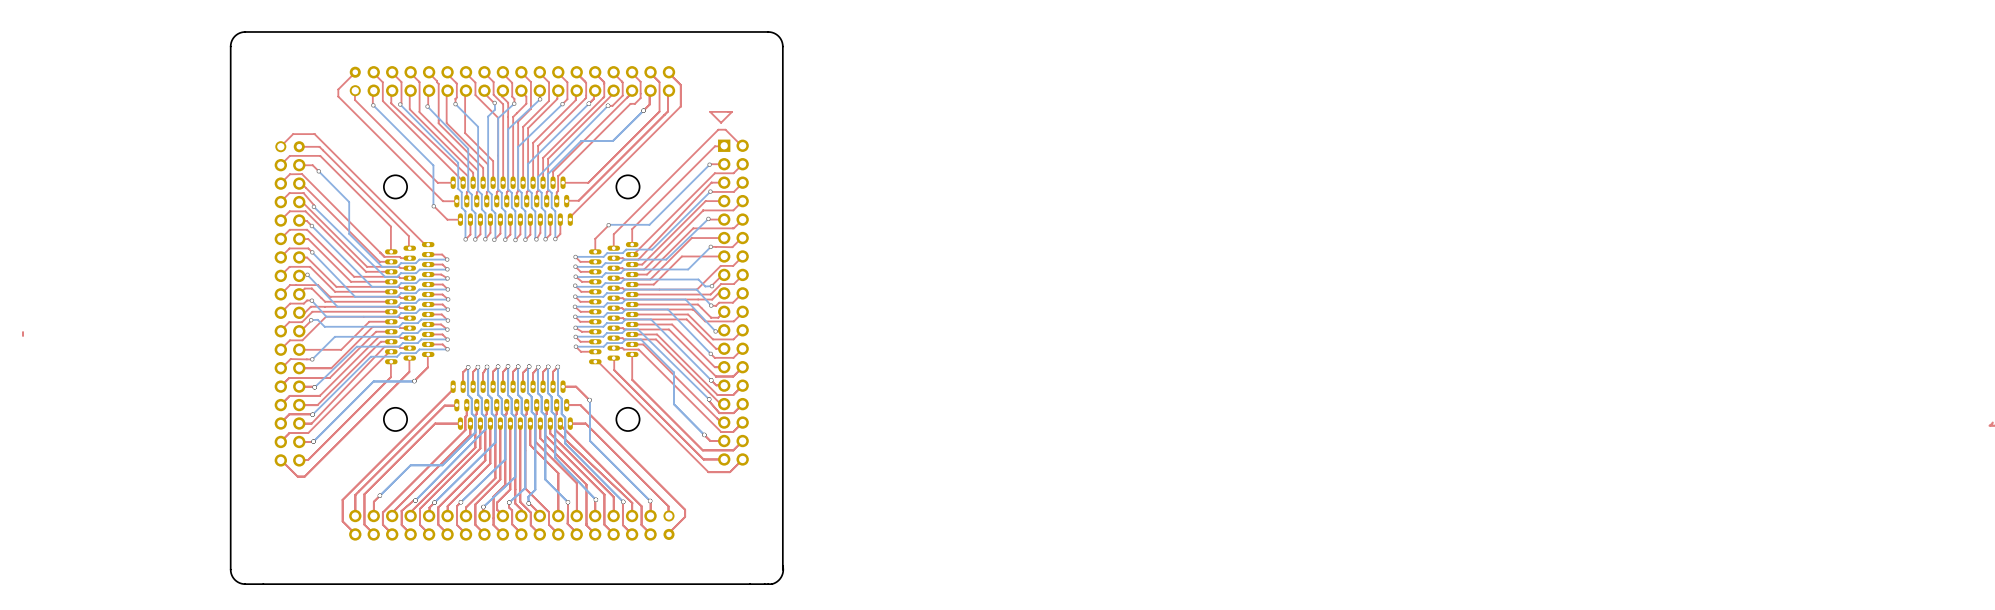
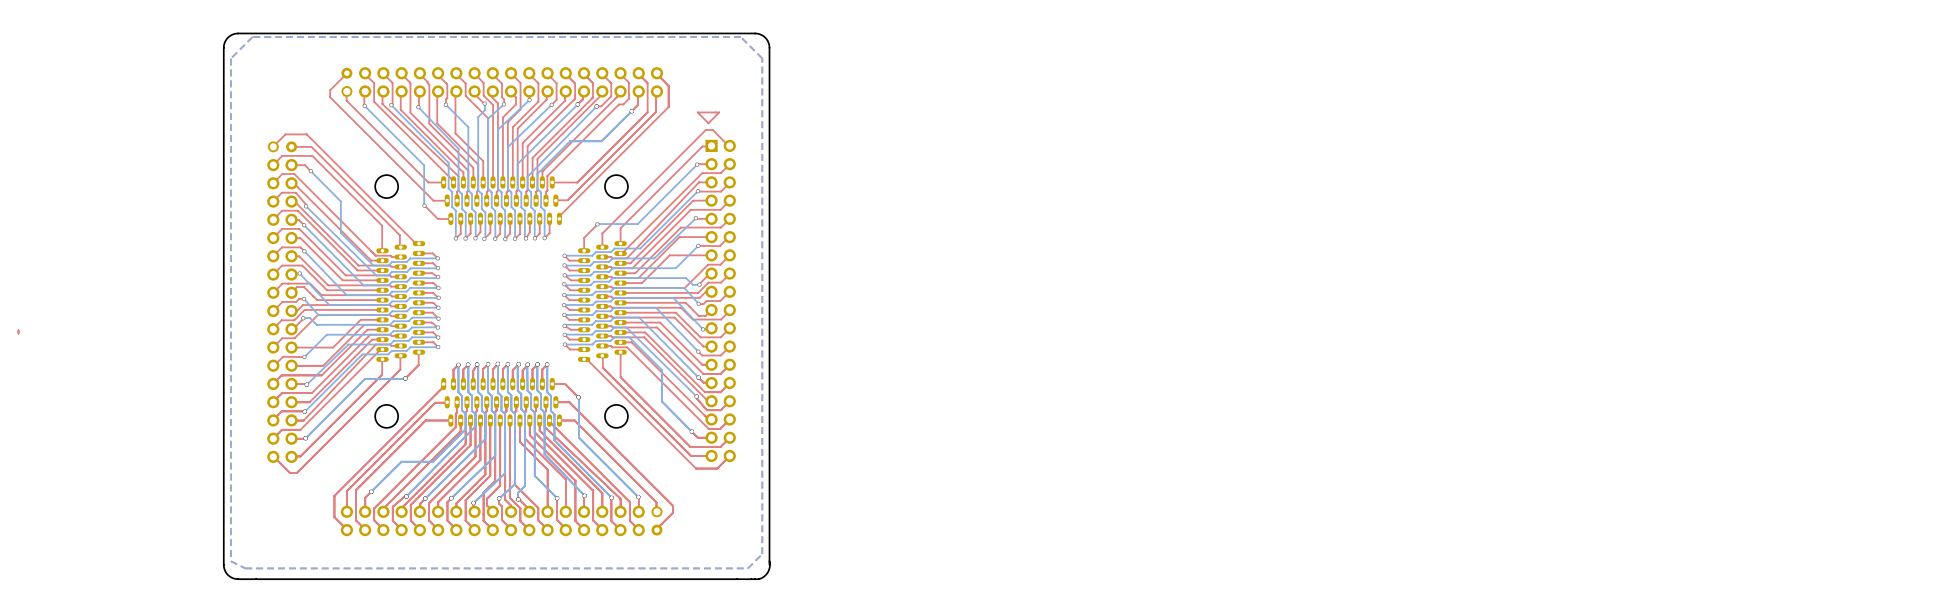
bottom zone outline: none -> (740, 37) (762, 58) (762, 554) (747, 568) (245, 568) (230, 561) (230, 58) (252, 37) (740, 37)

